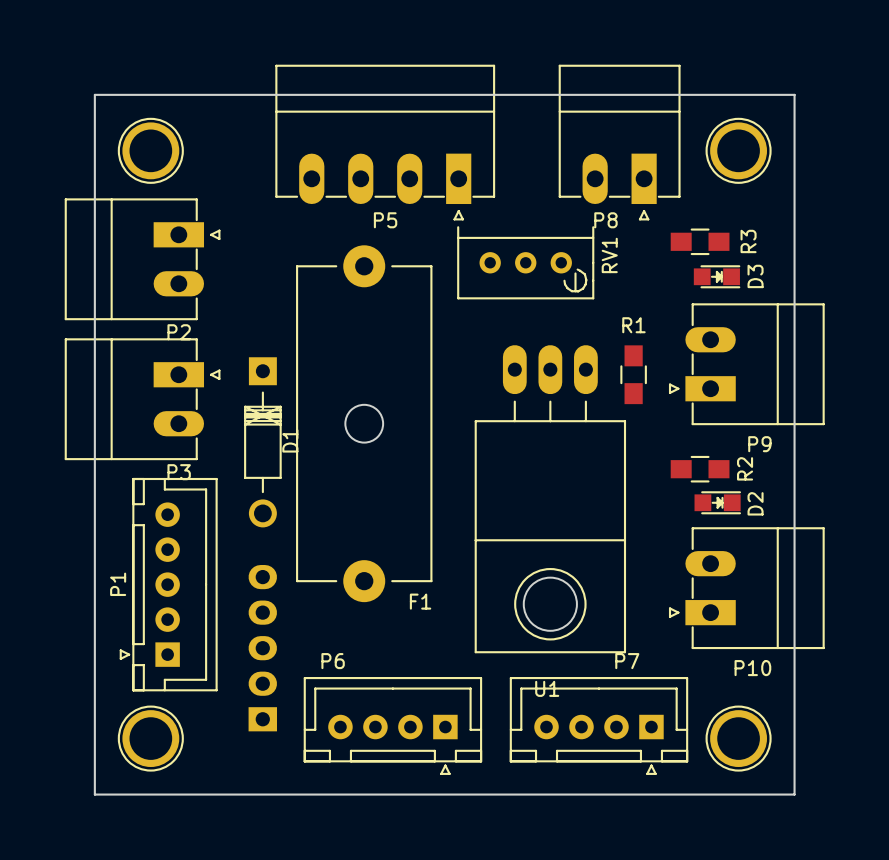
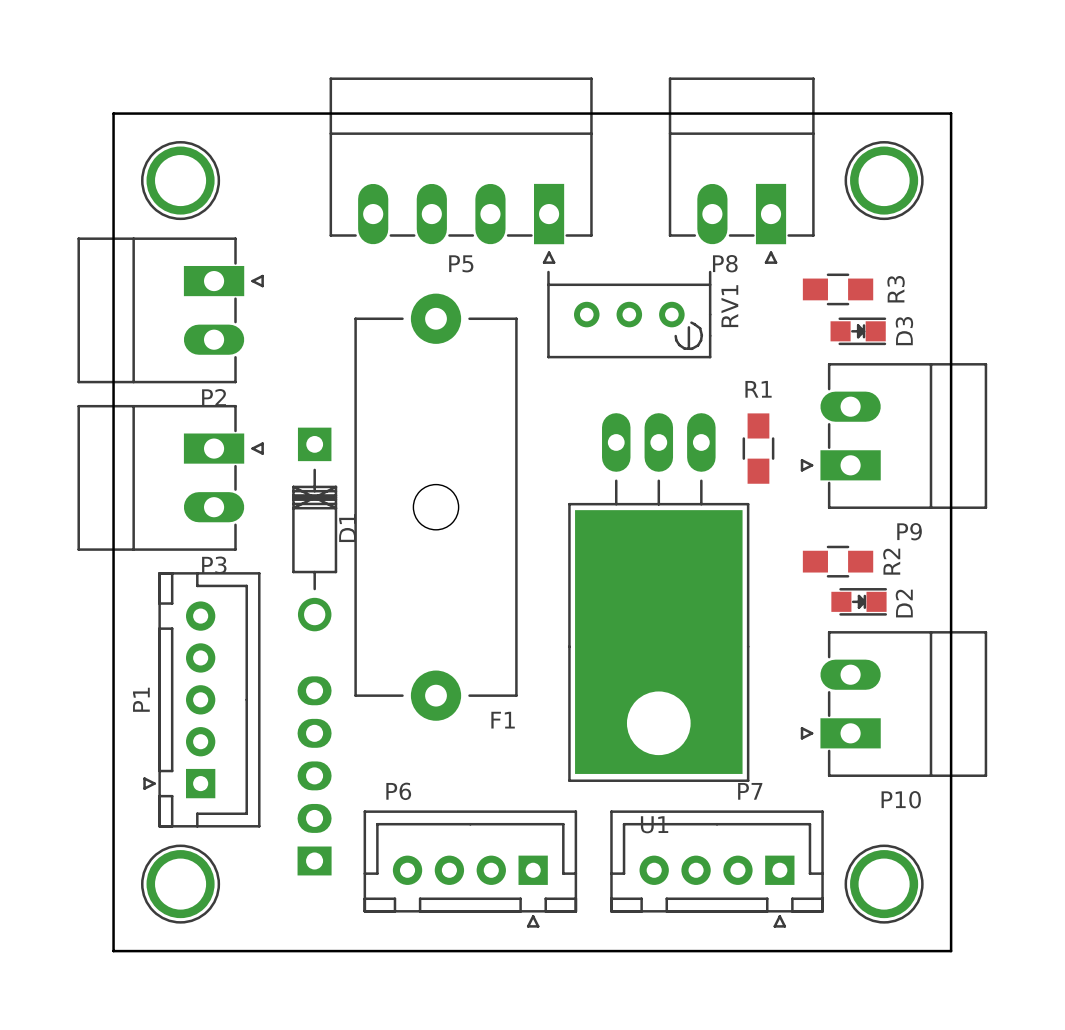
U1 footprint: [474, 345, 627, 654] -> [568, 413, 750, 782]

